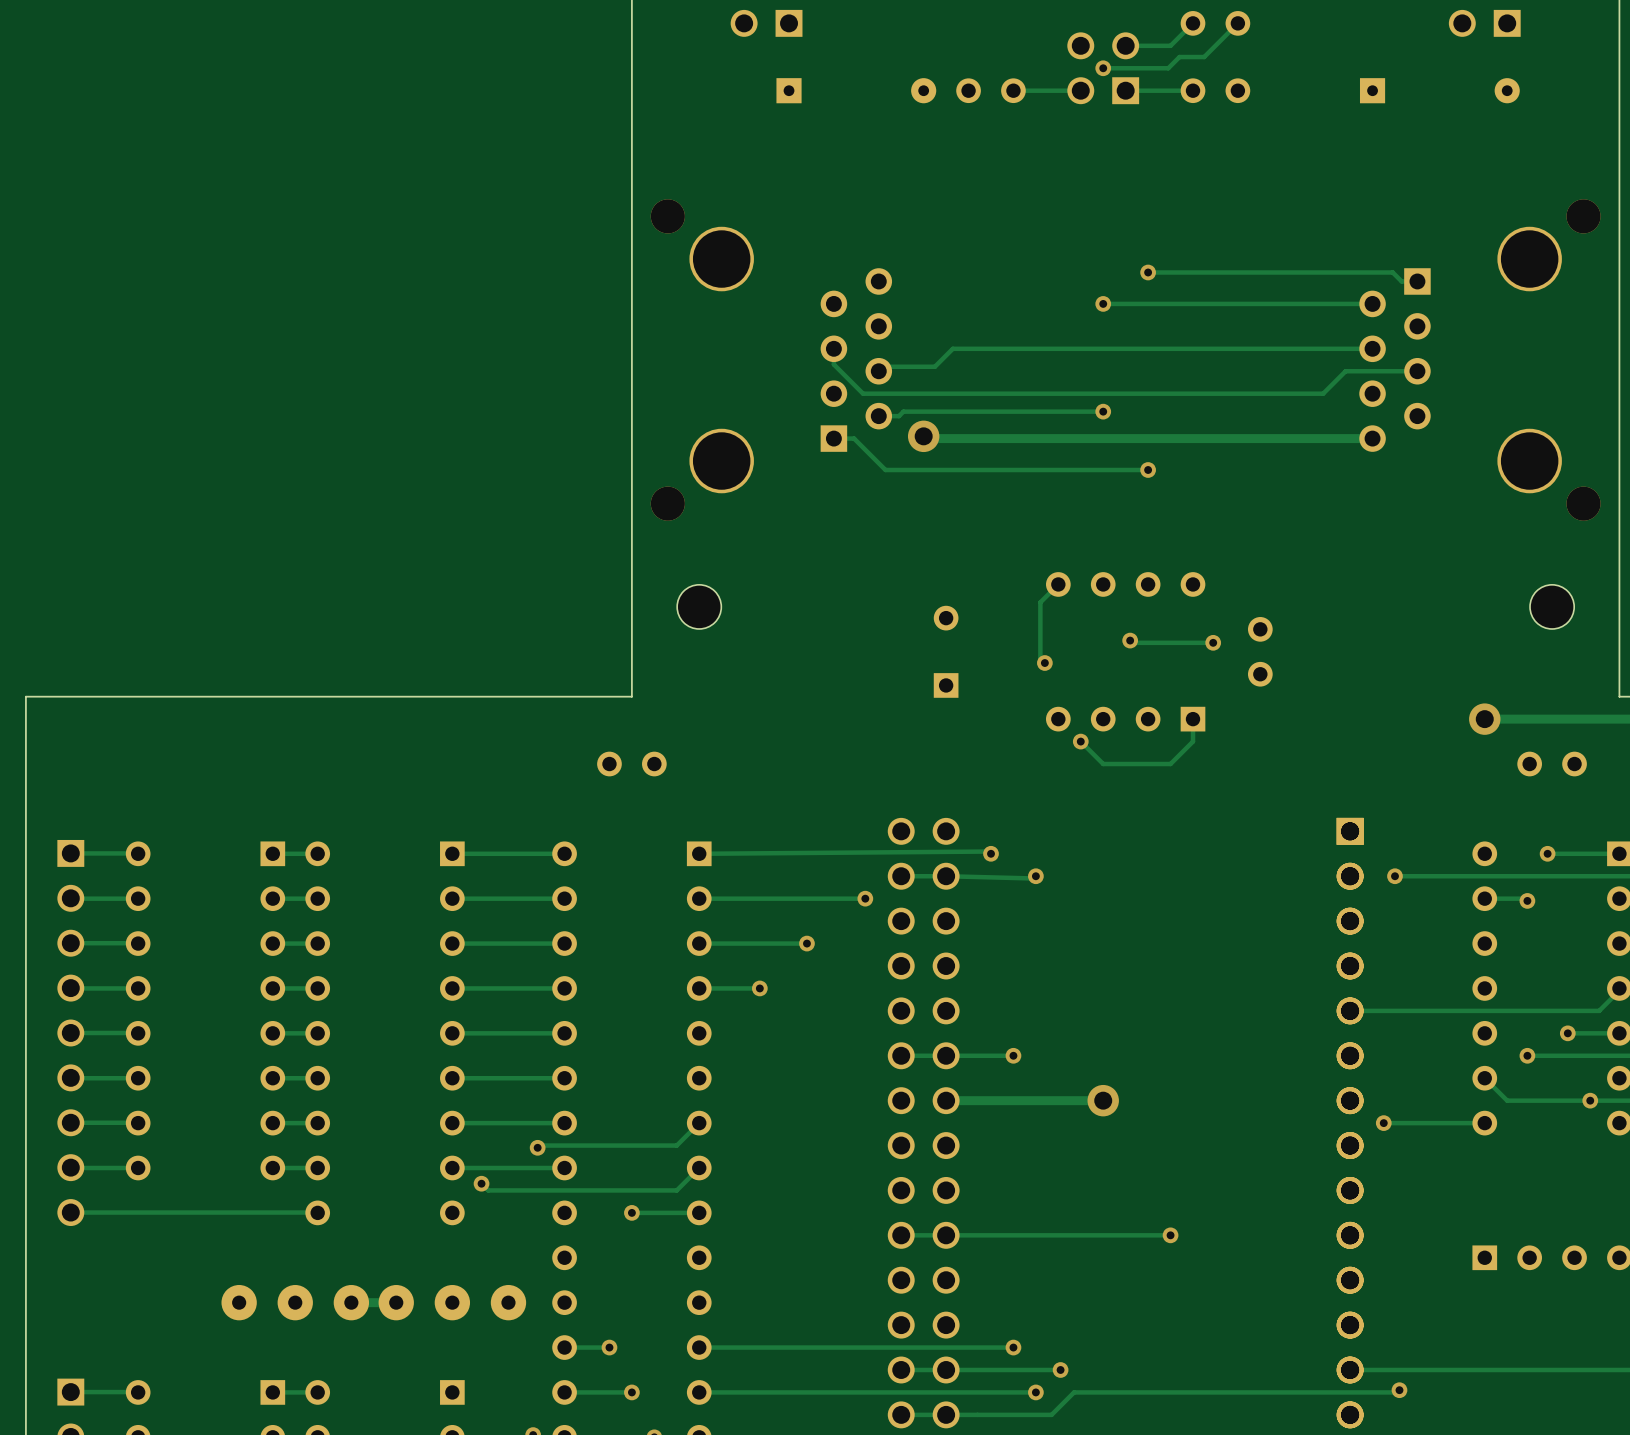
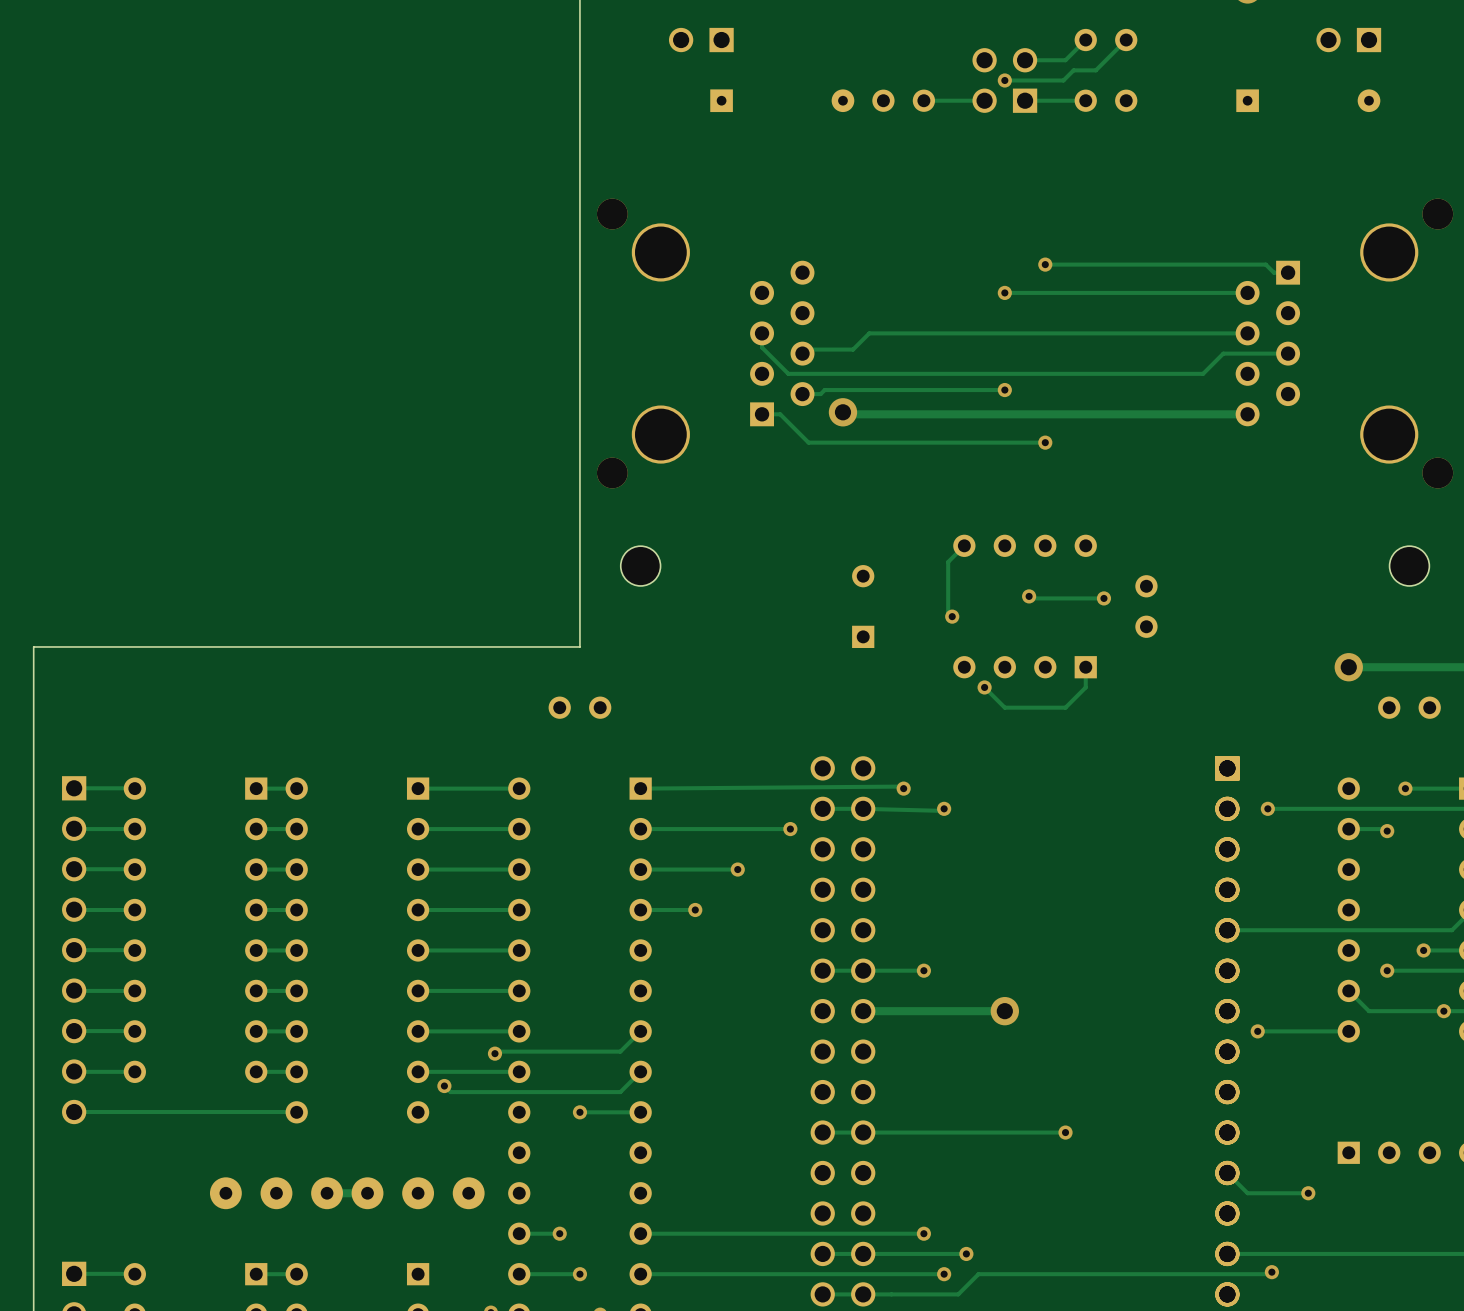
track: none -> (1227, 1173) (1247, 1193) (1308, 1193)
via: none -> (1308, 1193)

